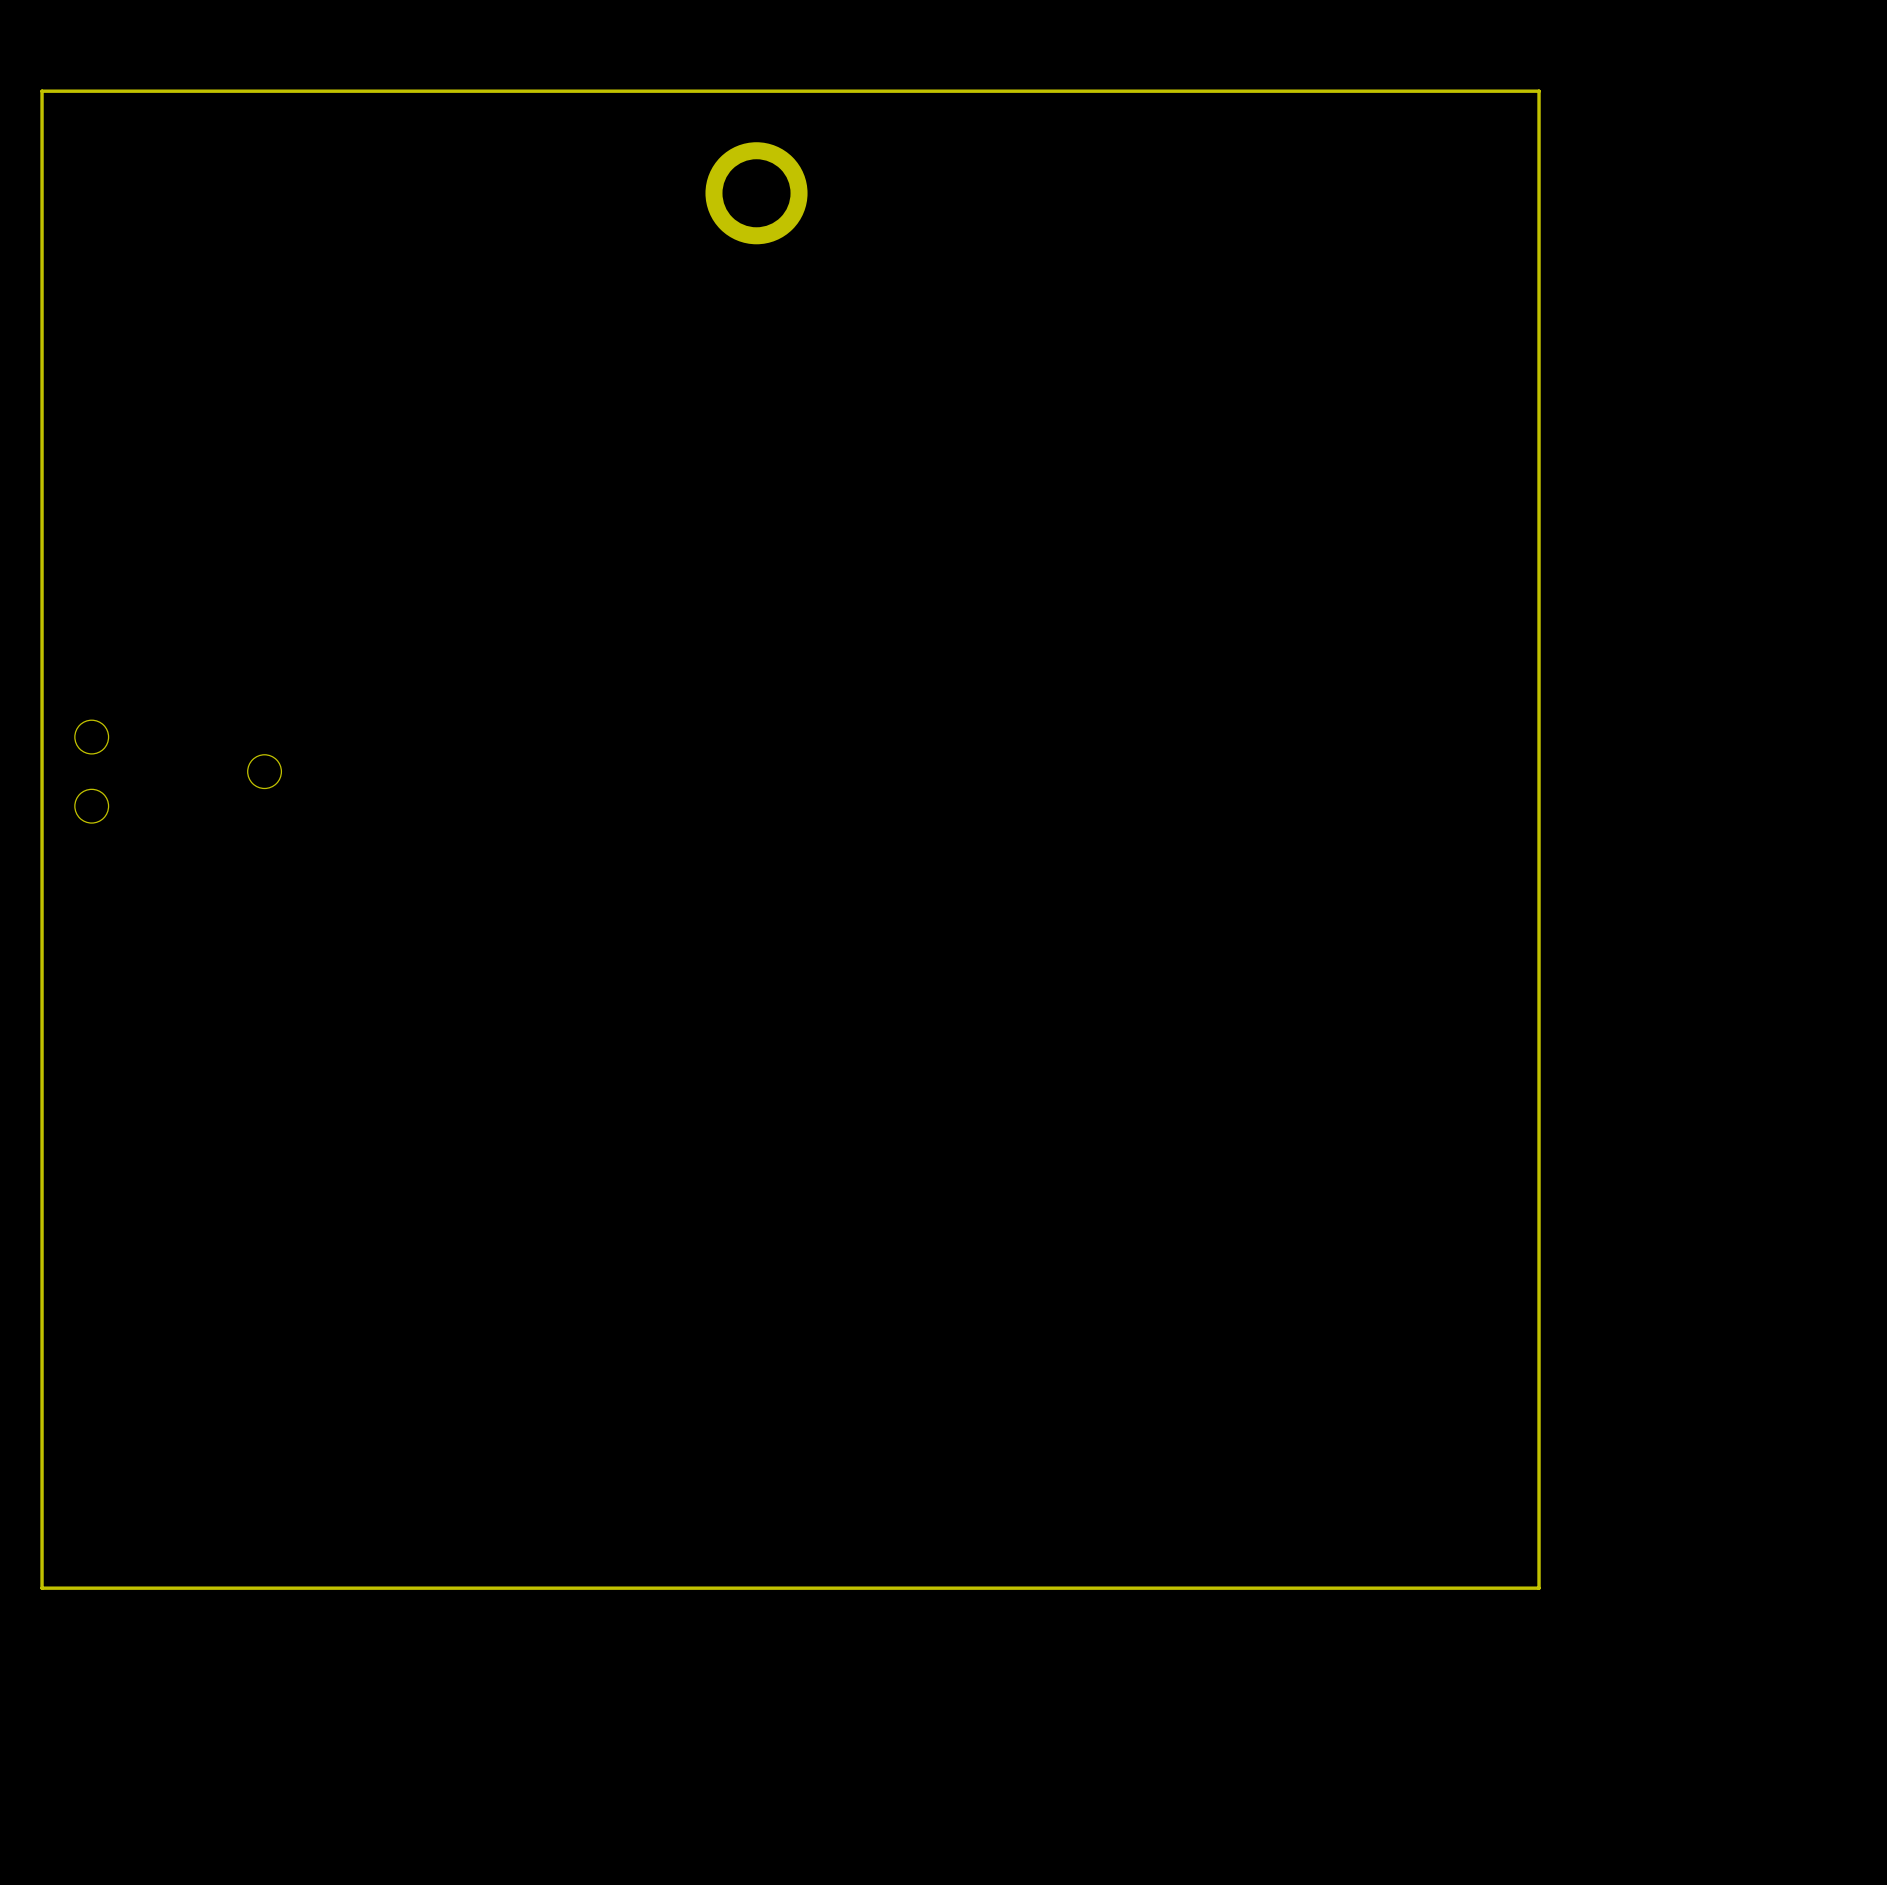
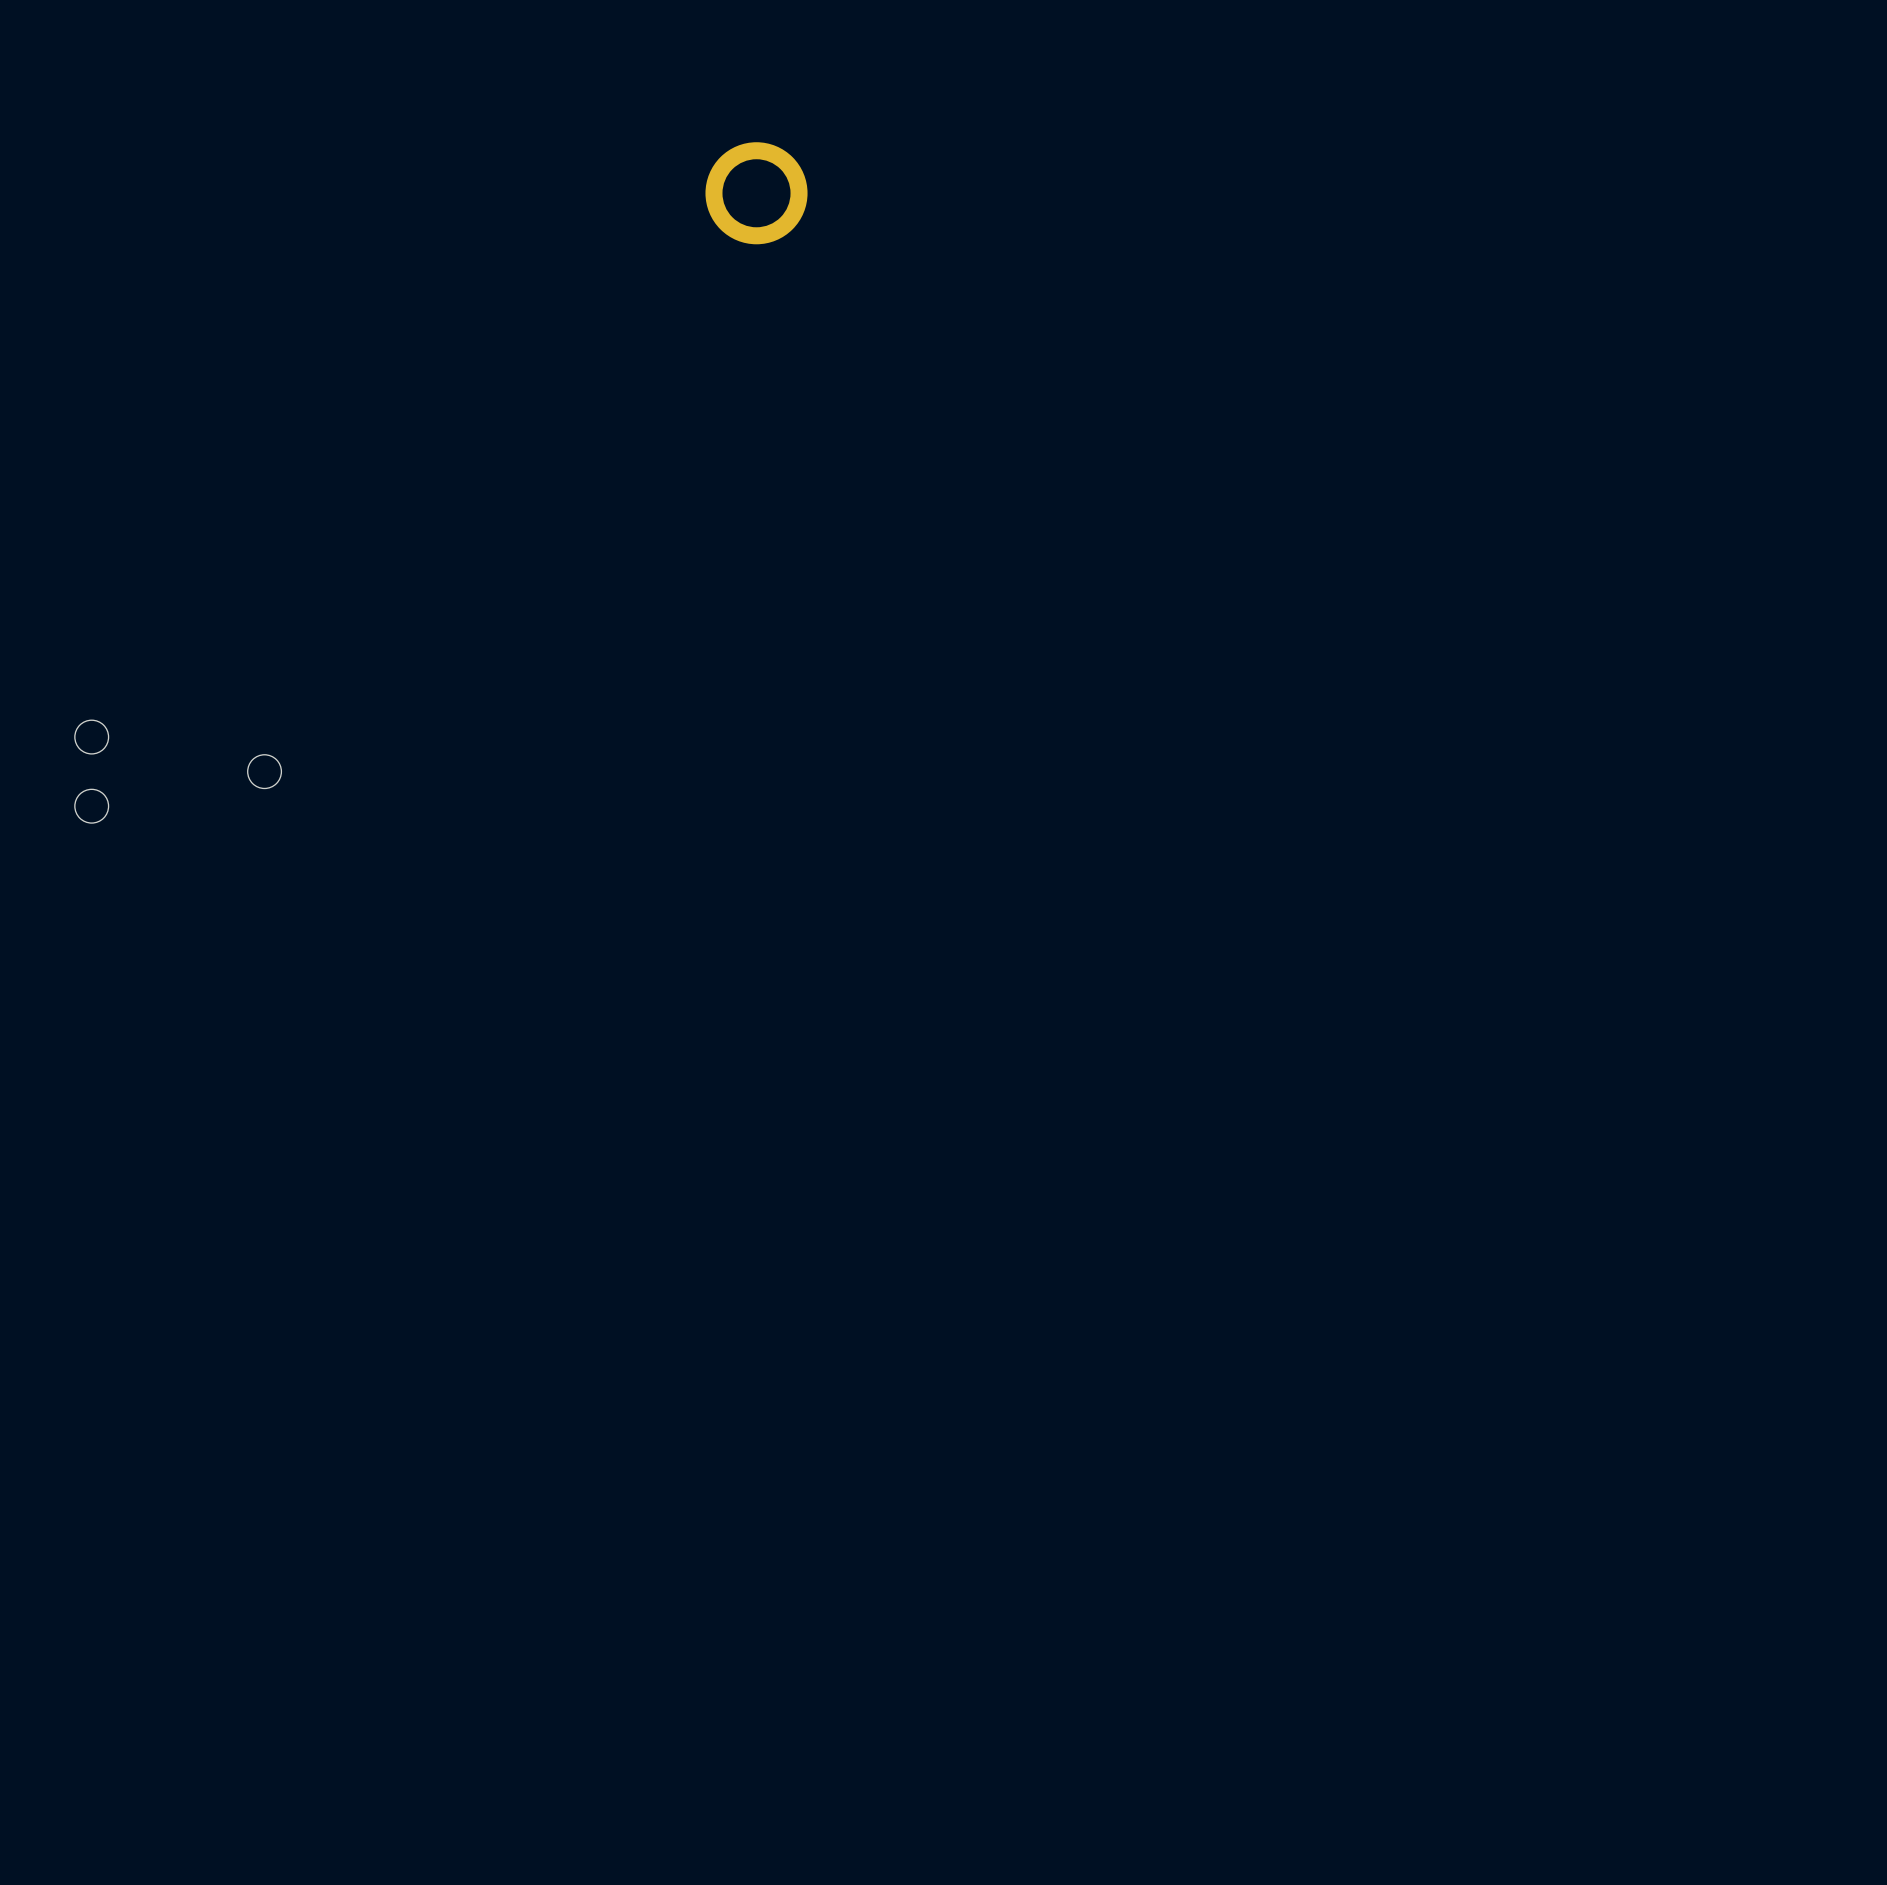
board edge: (1539, 91) (42, 91) (42, 1588) (1539, 1588) (1539, 91) -> none

